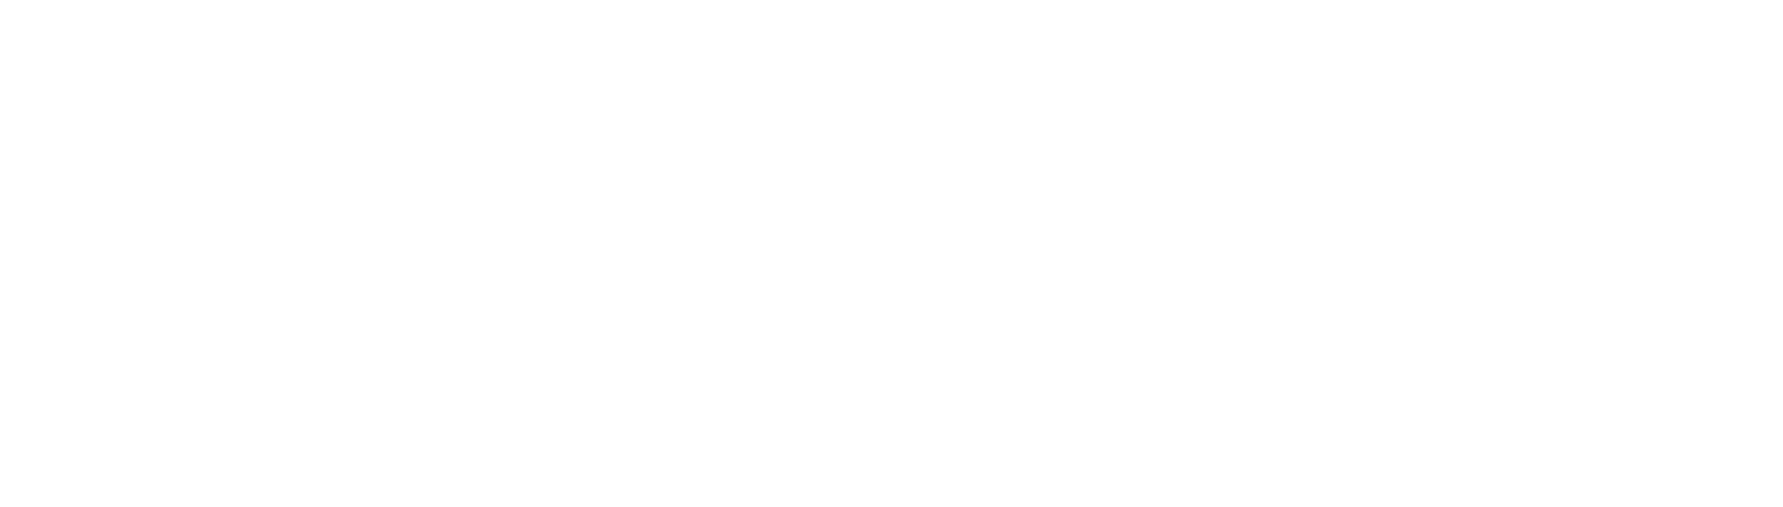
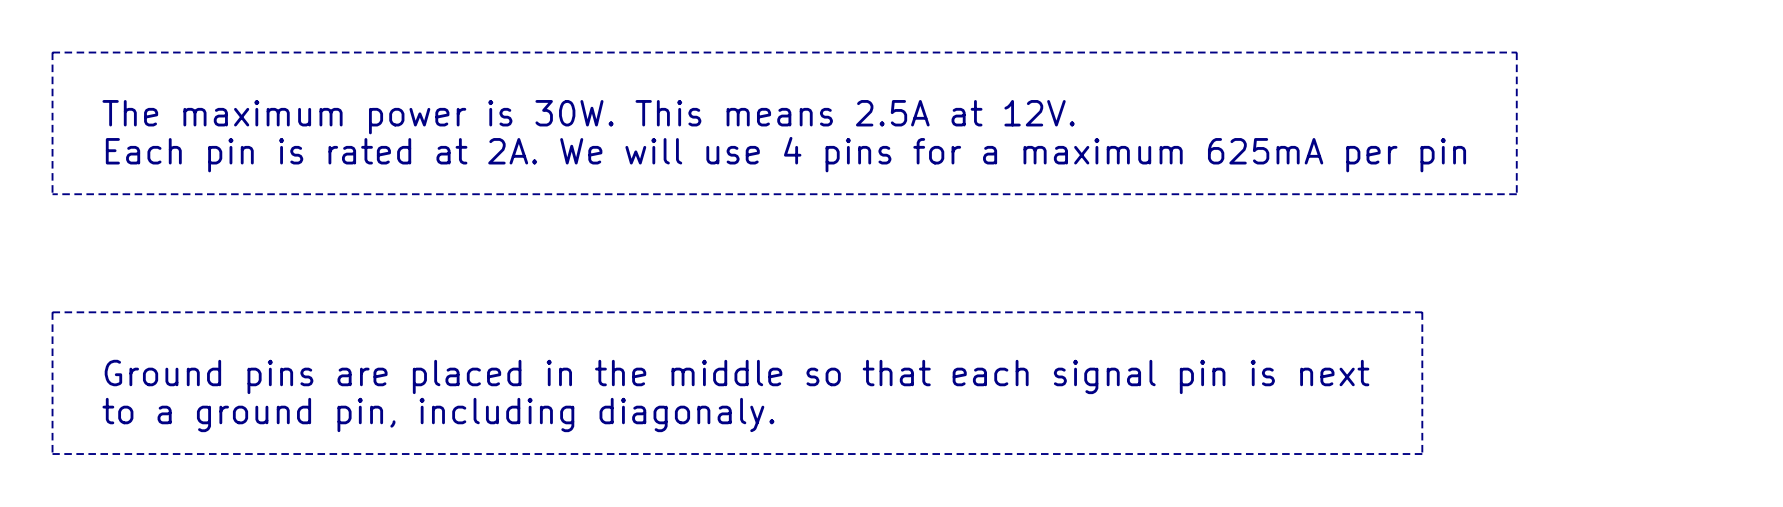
line: none -> (52, 52) (52, 194) (1516, 194) (1516, 52) (52, 52)
text: none -> The maximum power is 30W. This means 2.5A at 12V. (588, 117)
text: none -> Each pin is rated at 2A. We will use 4 pins for a maximum 625mA per pin (785, 154)
line: none -> (52, 312) (52, 454) (1422, 454) (1422, 312) (52, 312)
text: none -> Ground pins are placed in the middle so that each signal pin is next (737, 376)
text: none -> to a ground pin, including diagonaly. (438, 414)

